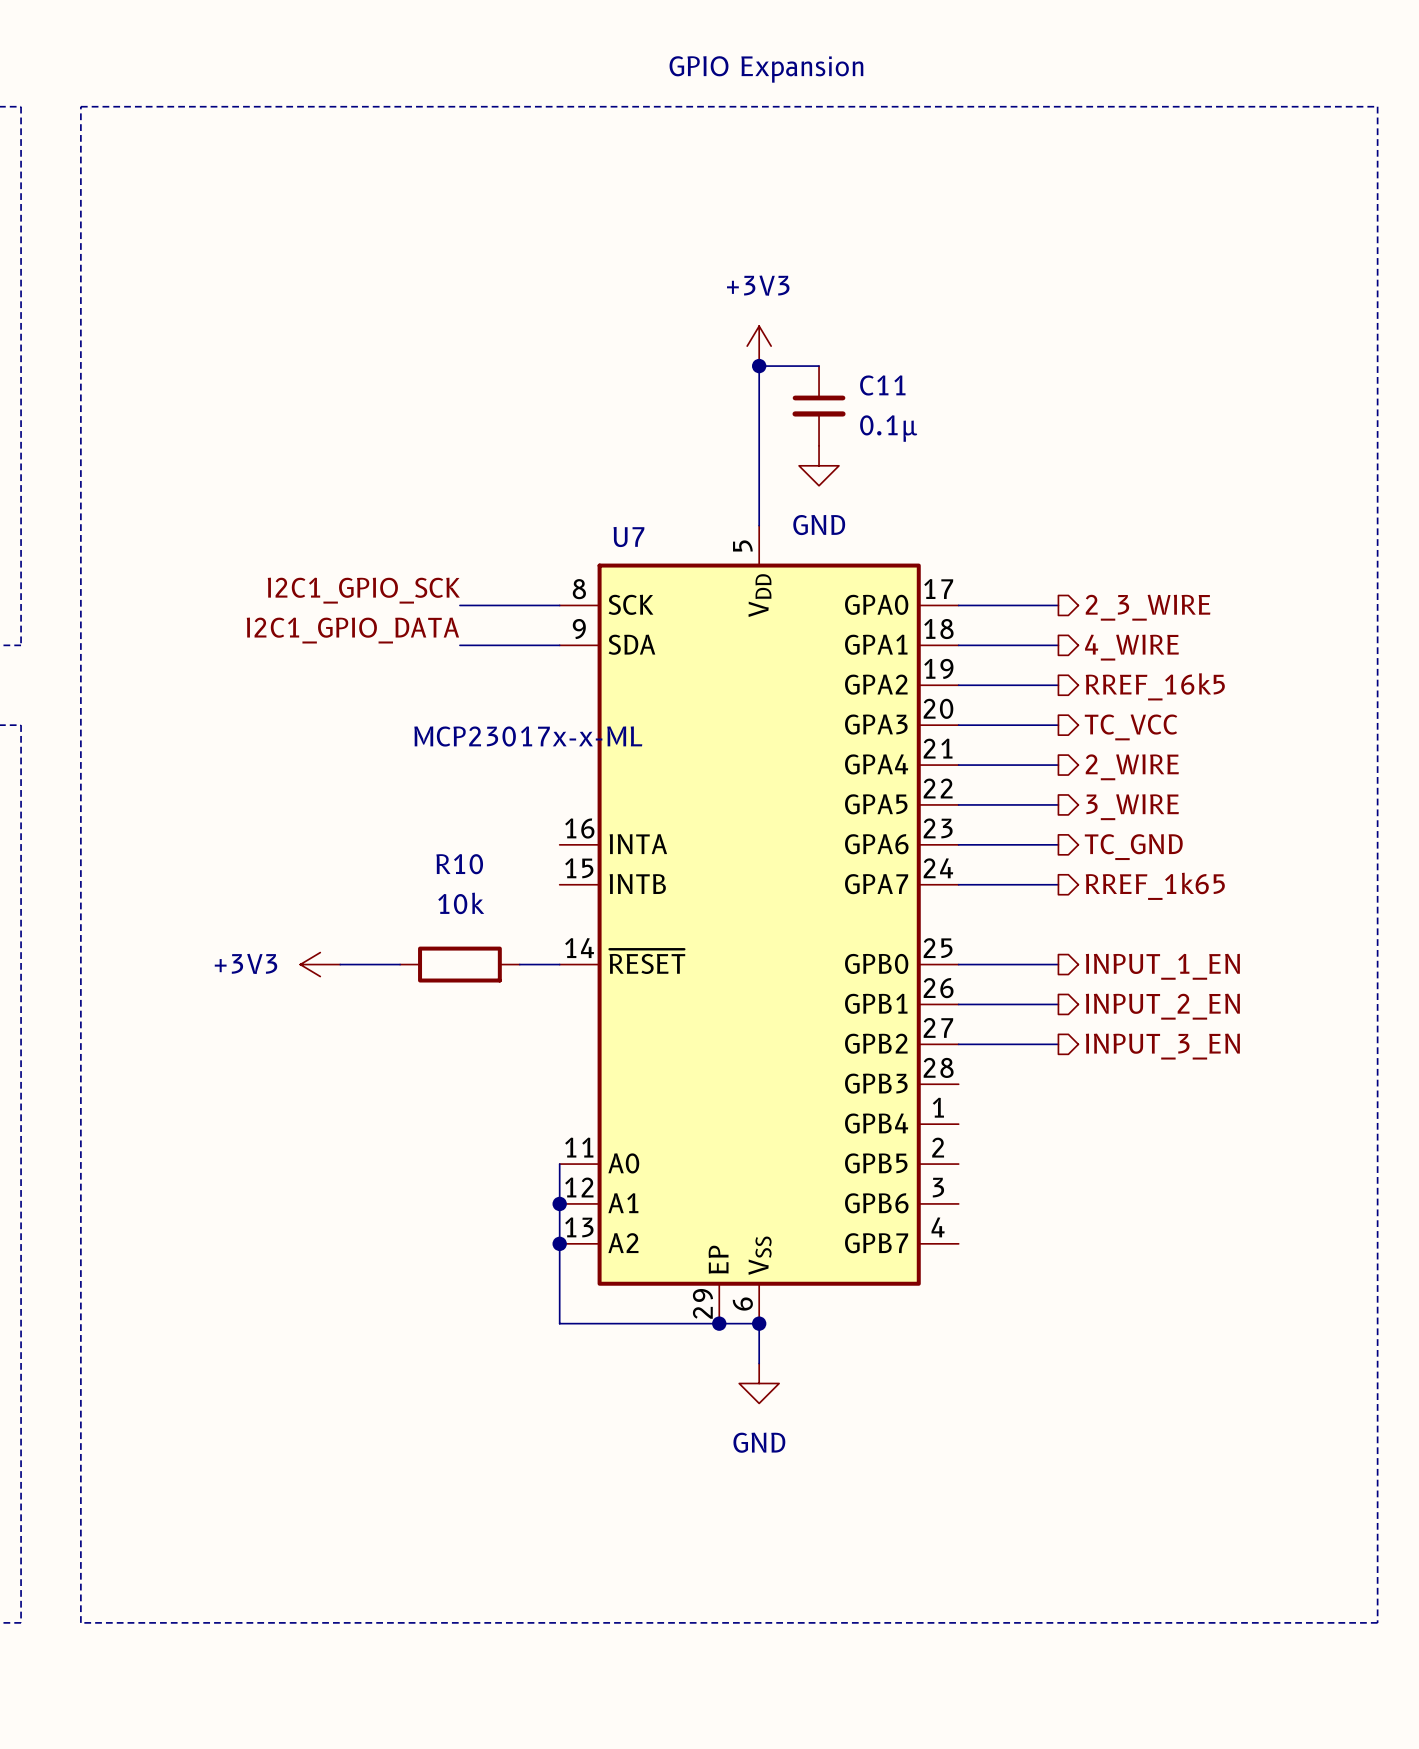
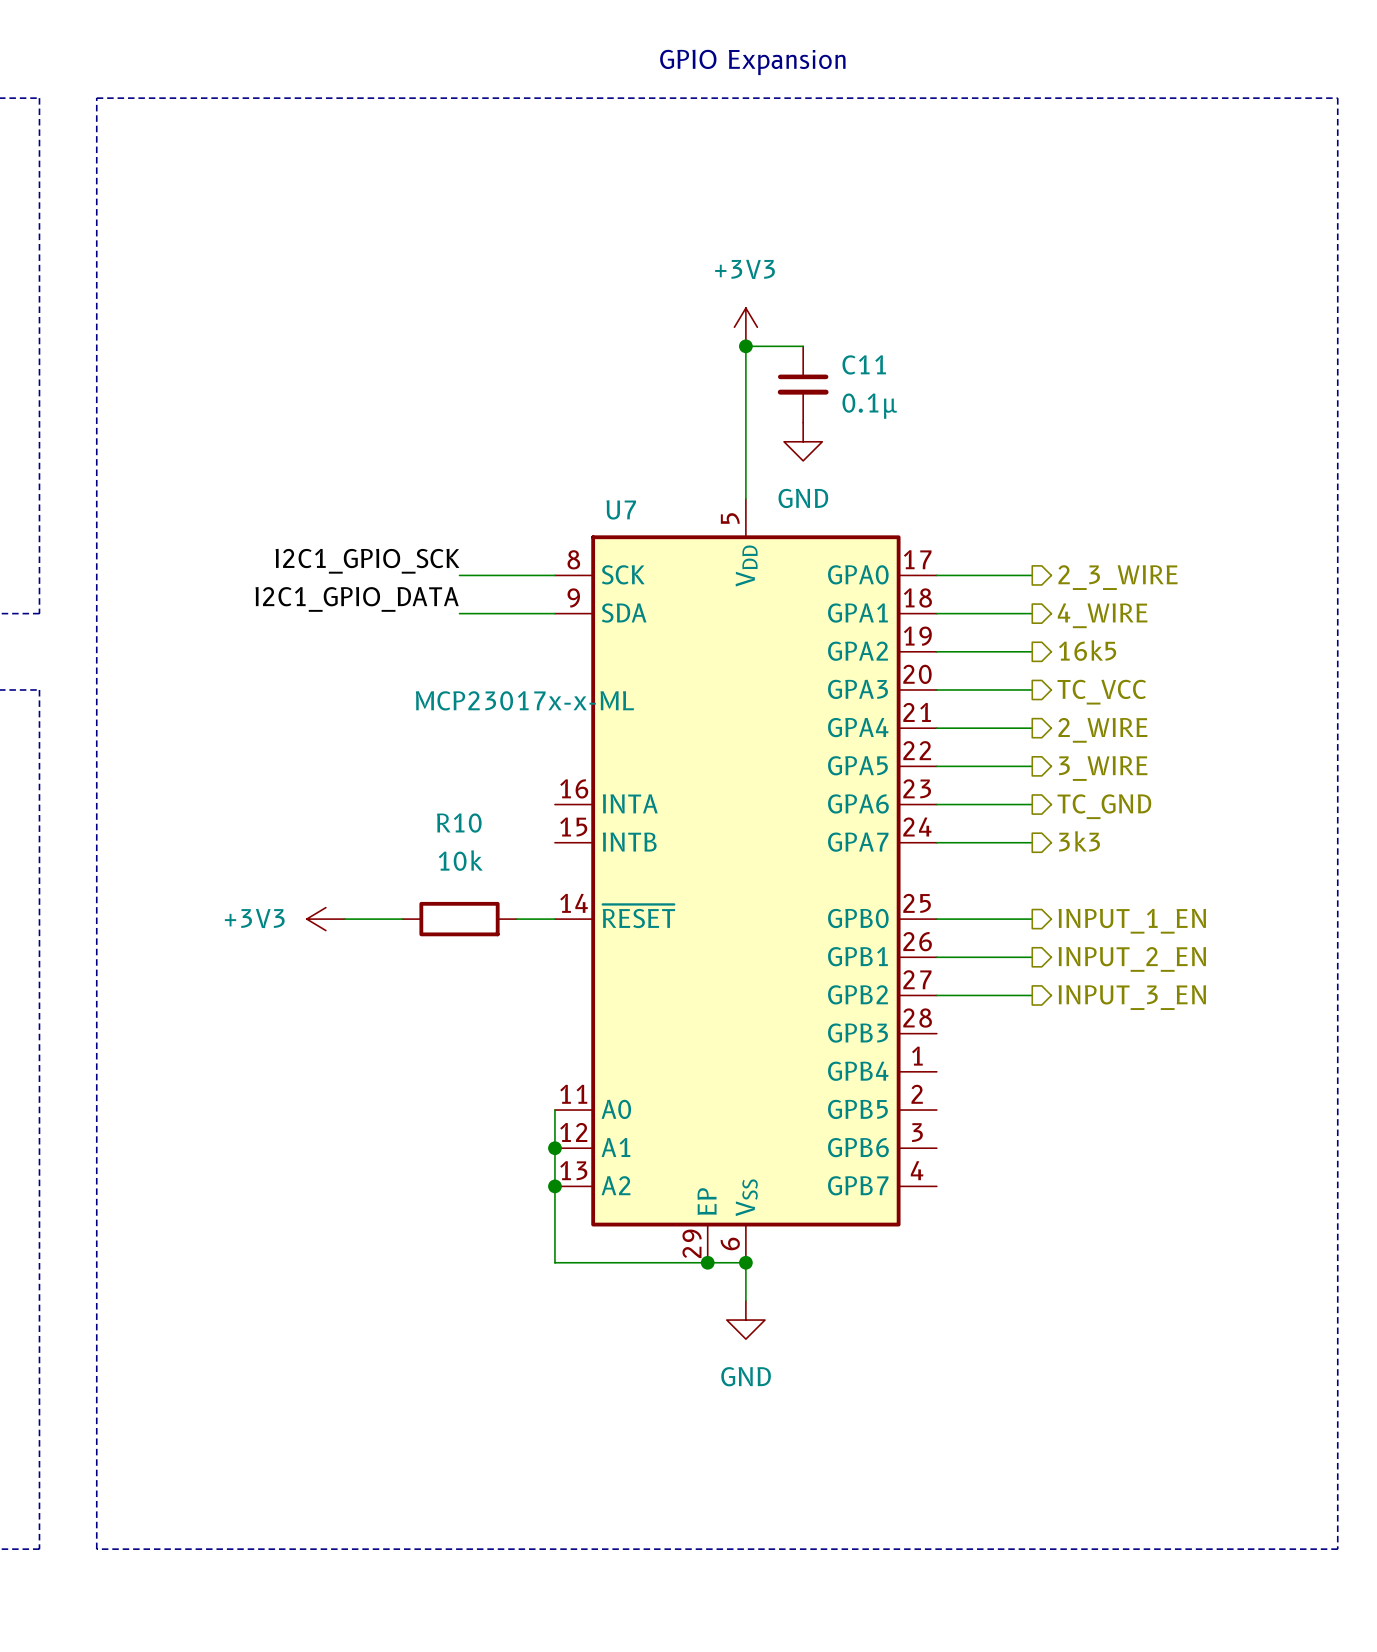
hierarchical label: RREF_16k5 (1155, 686) -> 16k5 (1087, 650)
hierarchical label: RREF_1k65 (1155, 886) -> 3k3 (1079, 841)

